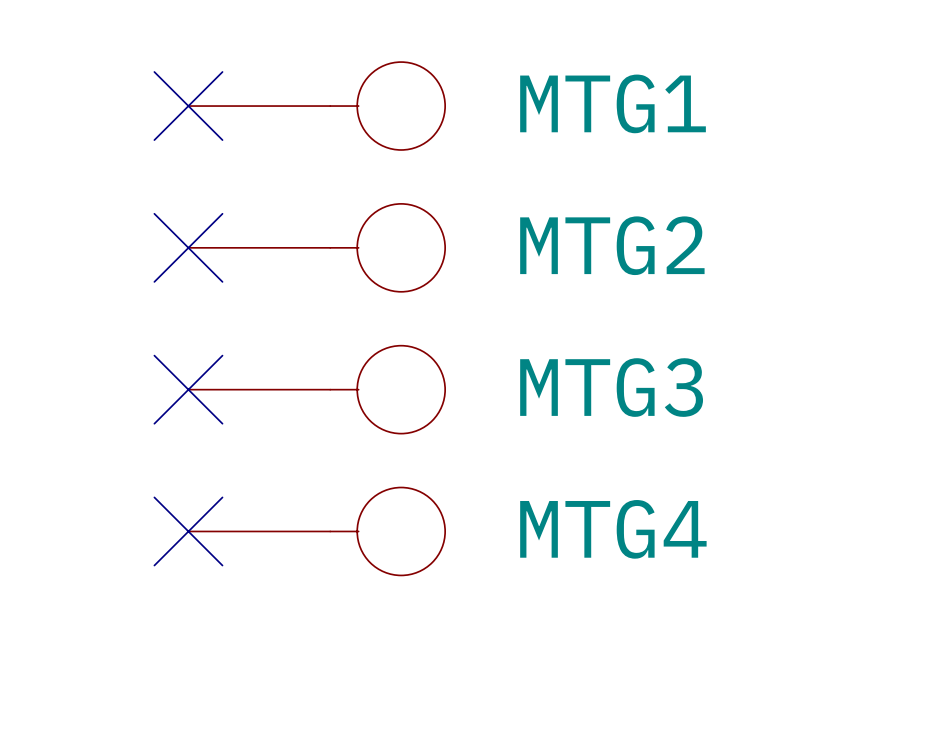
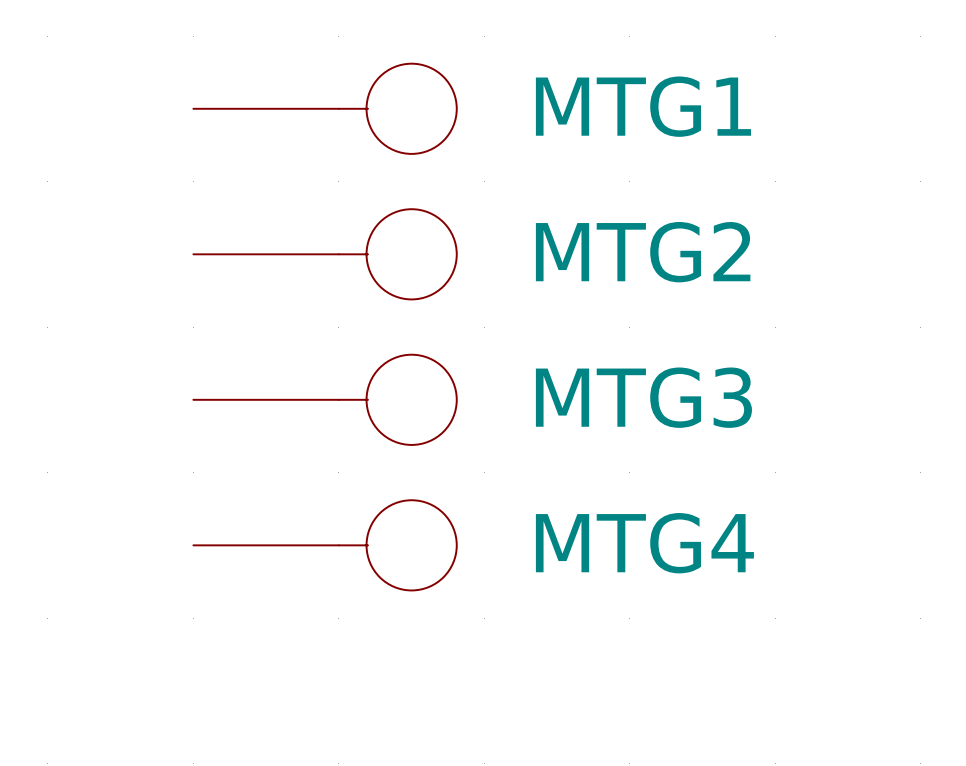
no-connect mark: (188, 106) -> none
no-connect mark: (188, 247) -> none
no-connect mark: (188, 389) -> none
no-connect mark: (188, 531) -> none

